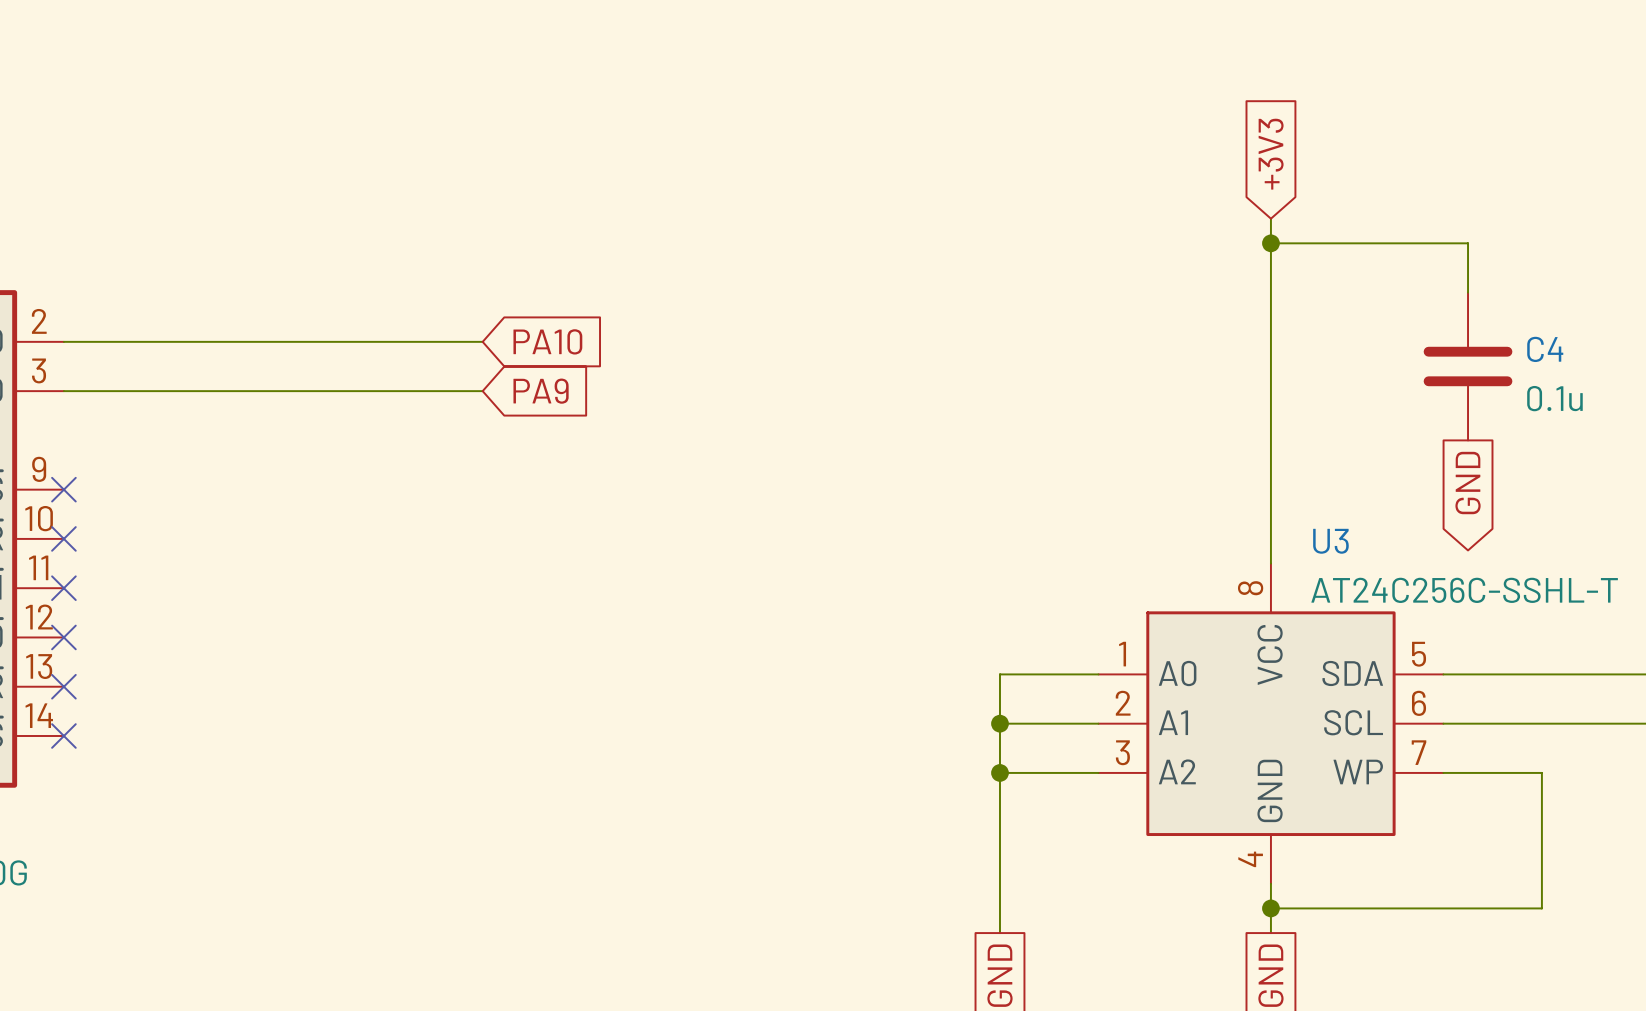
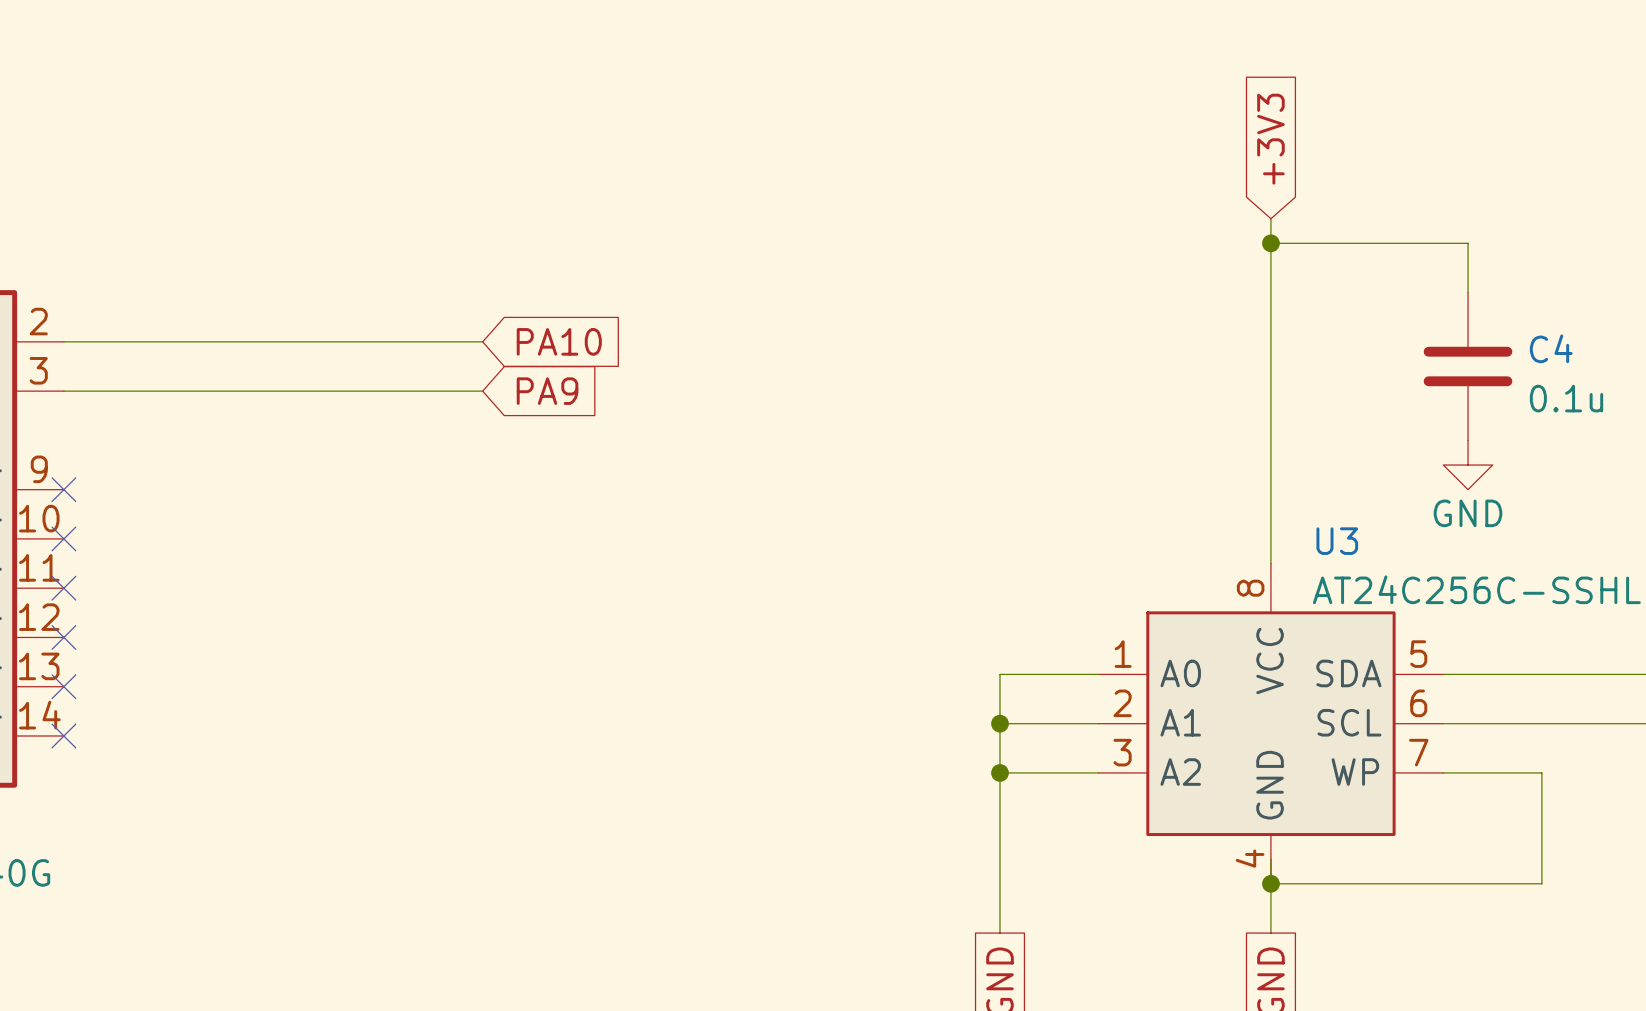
power symbol: none -> GND (1468, 465)
global label: GND (1468, 483) -> none
wire: (1541, 883) (1541, 908) (1270, 908) -> (1541, 883) (1270, 883) (1270, 859)
junction position: (1270, 908) -> (1270, 883)

